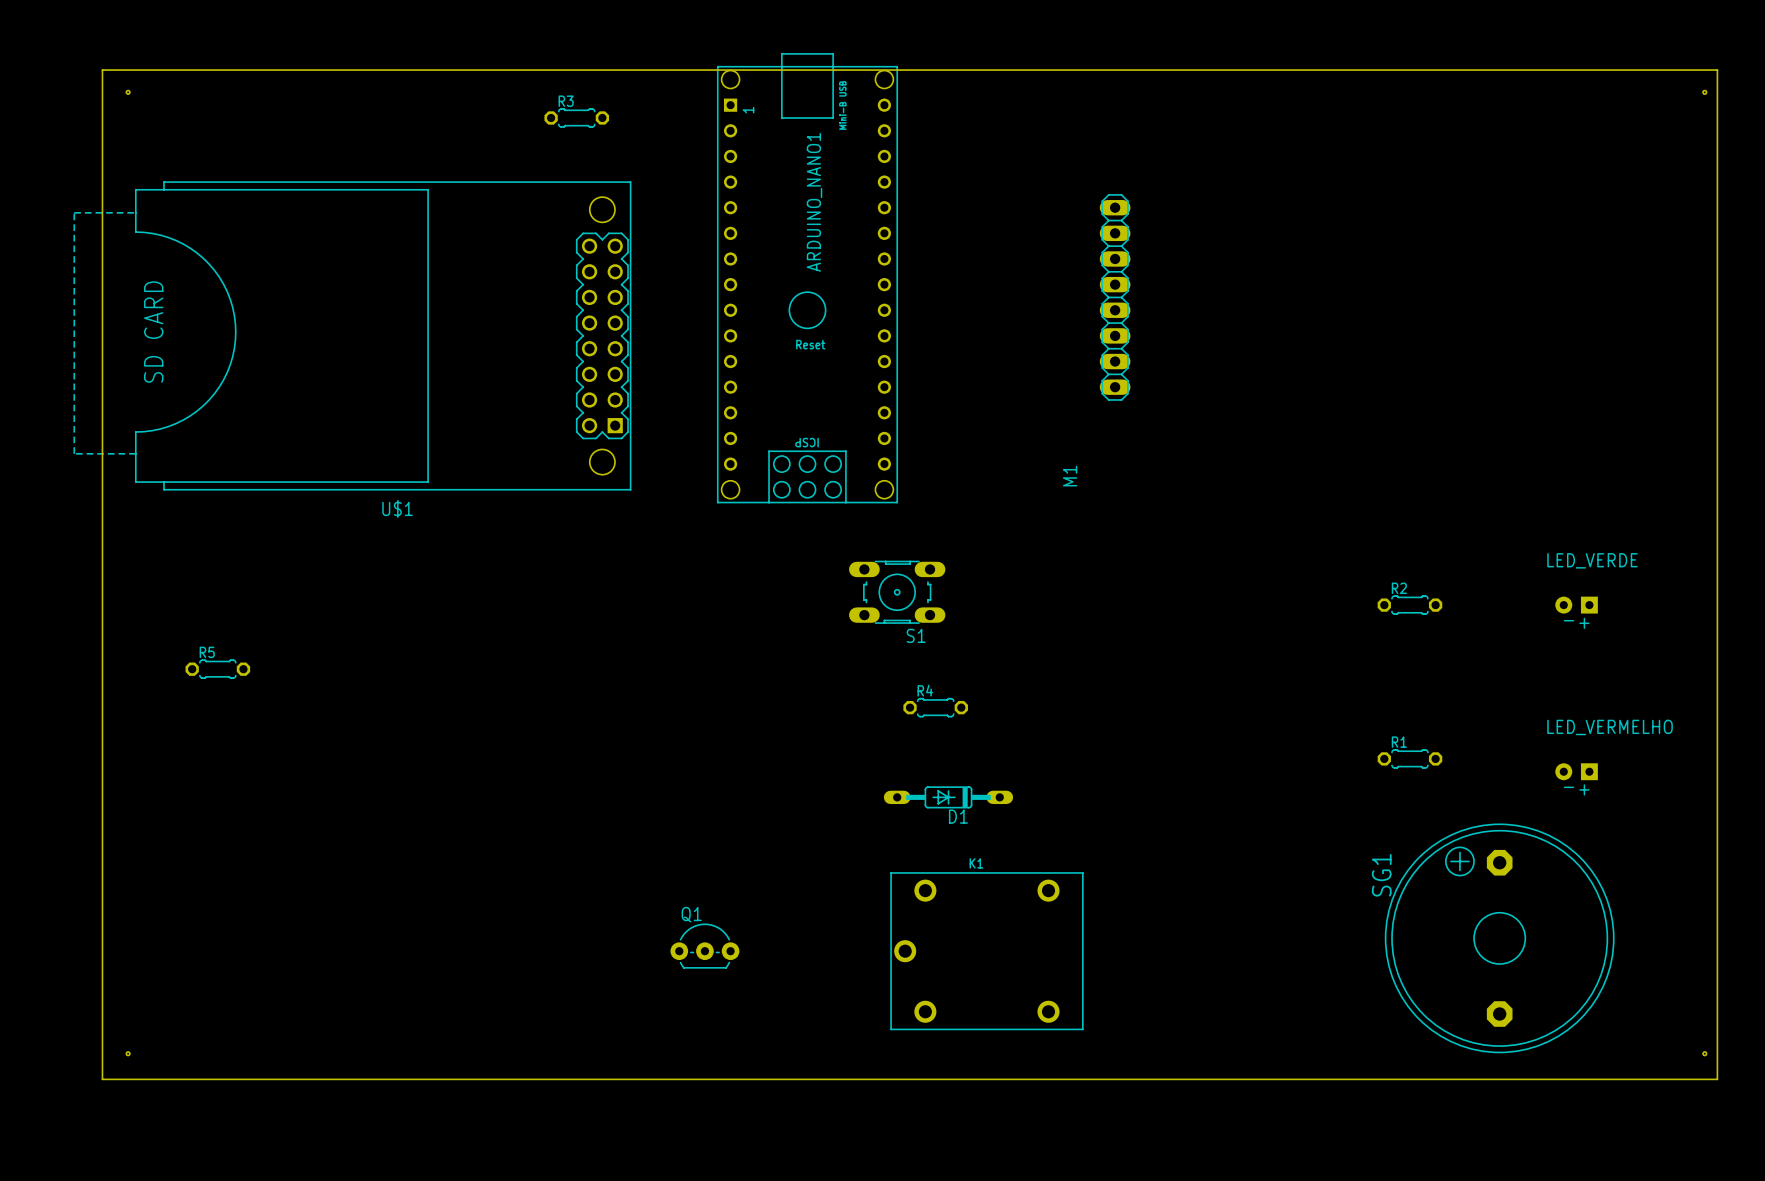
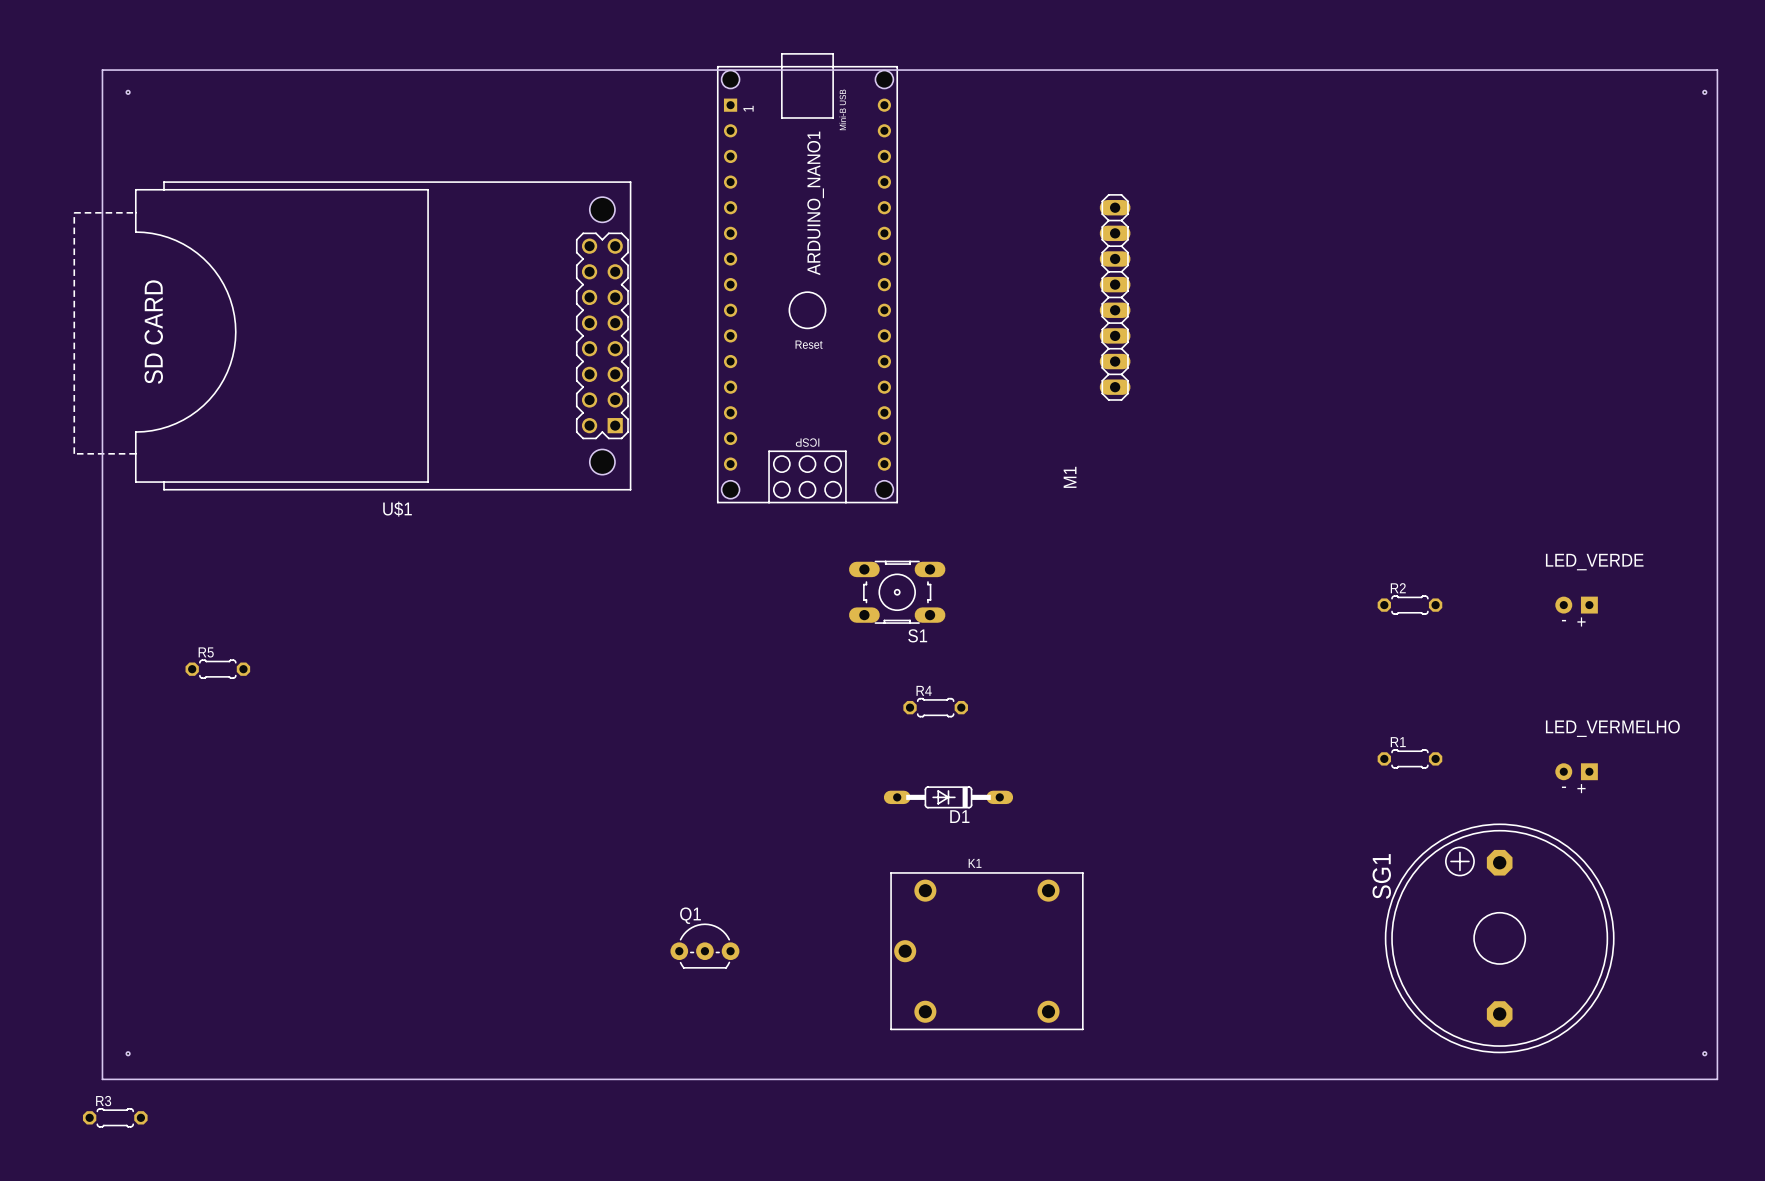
R3 position: (576, 117) -> (115, 1117)

